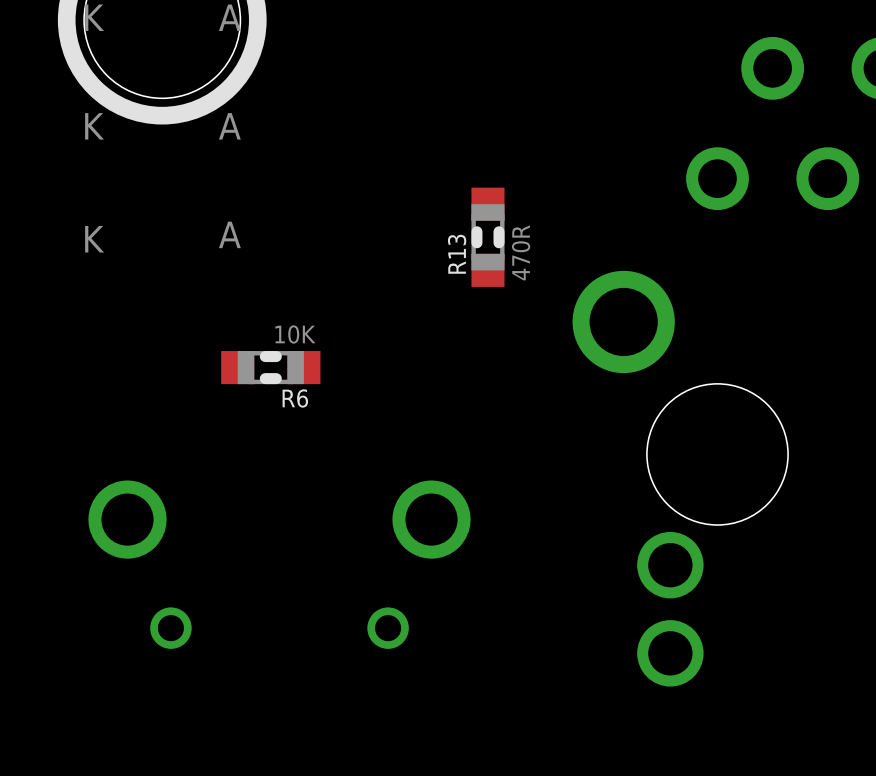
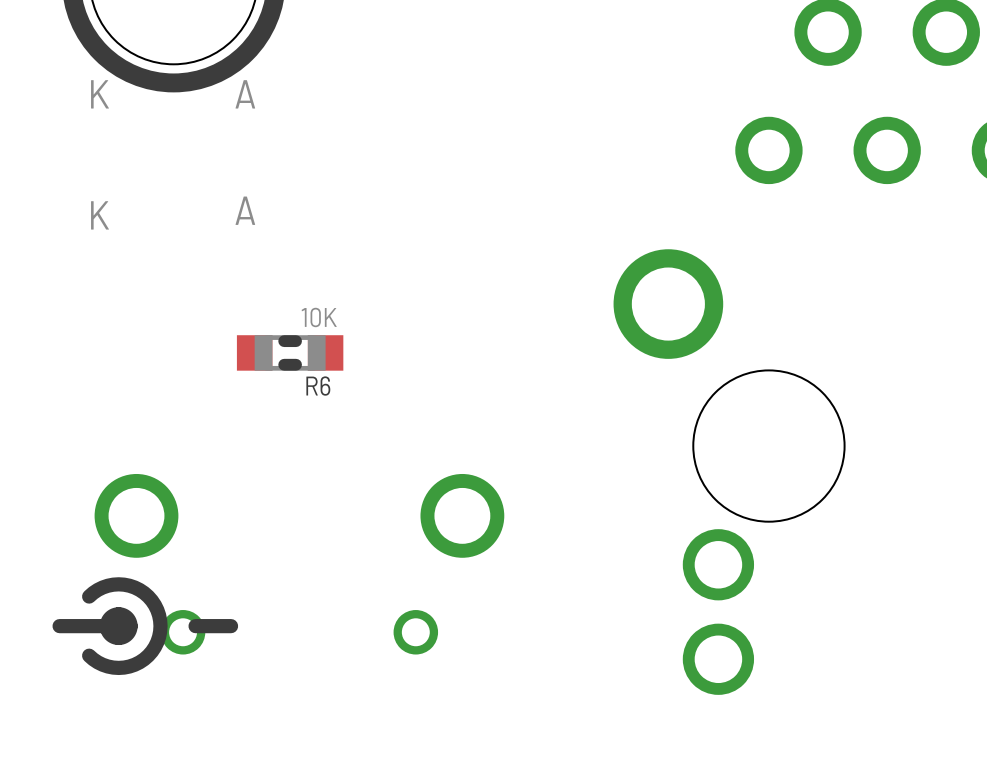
R13: 470R (487, 237) -> none
line: none -> (89, 596) (107, 585) (118, 584) (134, 587) (151, 600) (157, 610) (160, 626) (157, 642) (151, 651) (134, 664) (118, 667) (107, 666) (89, 655)
line: none -> (118, 614) (127, 617) (130, 626) (127, 634) (118, 637) (110, 634) (106, 626) (110, 617) (118, 614)
line: none -> (59, 626) (118, 626)
line: none -> (195, 626) (231, 626)

